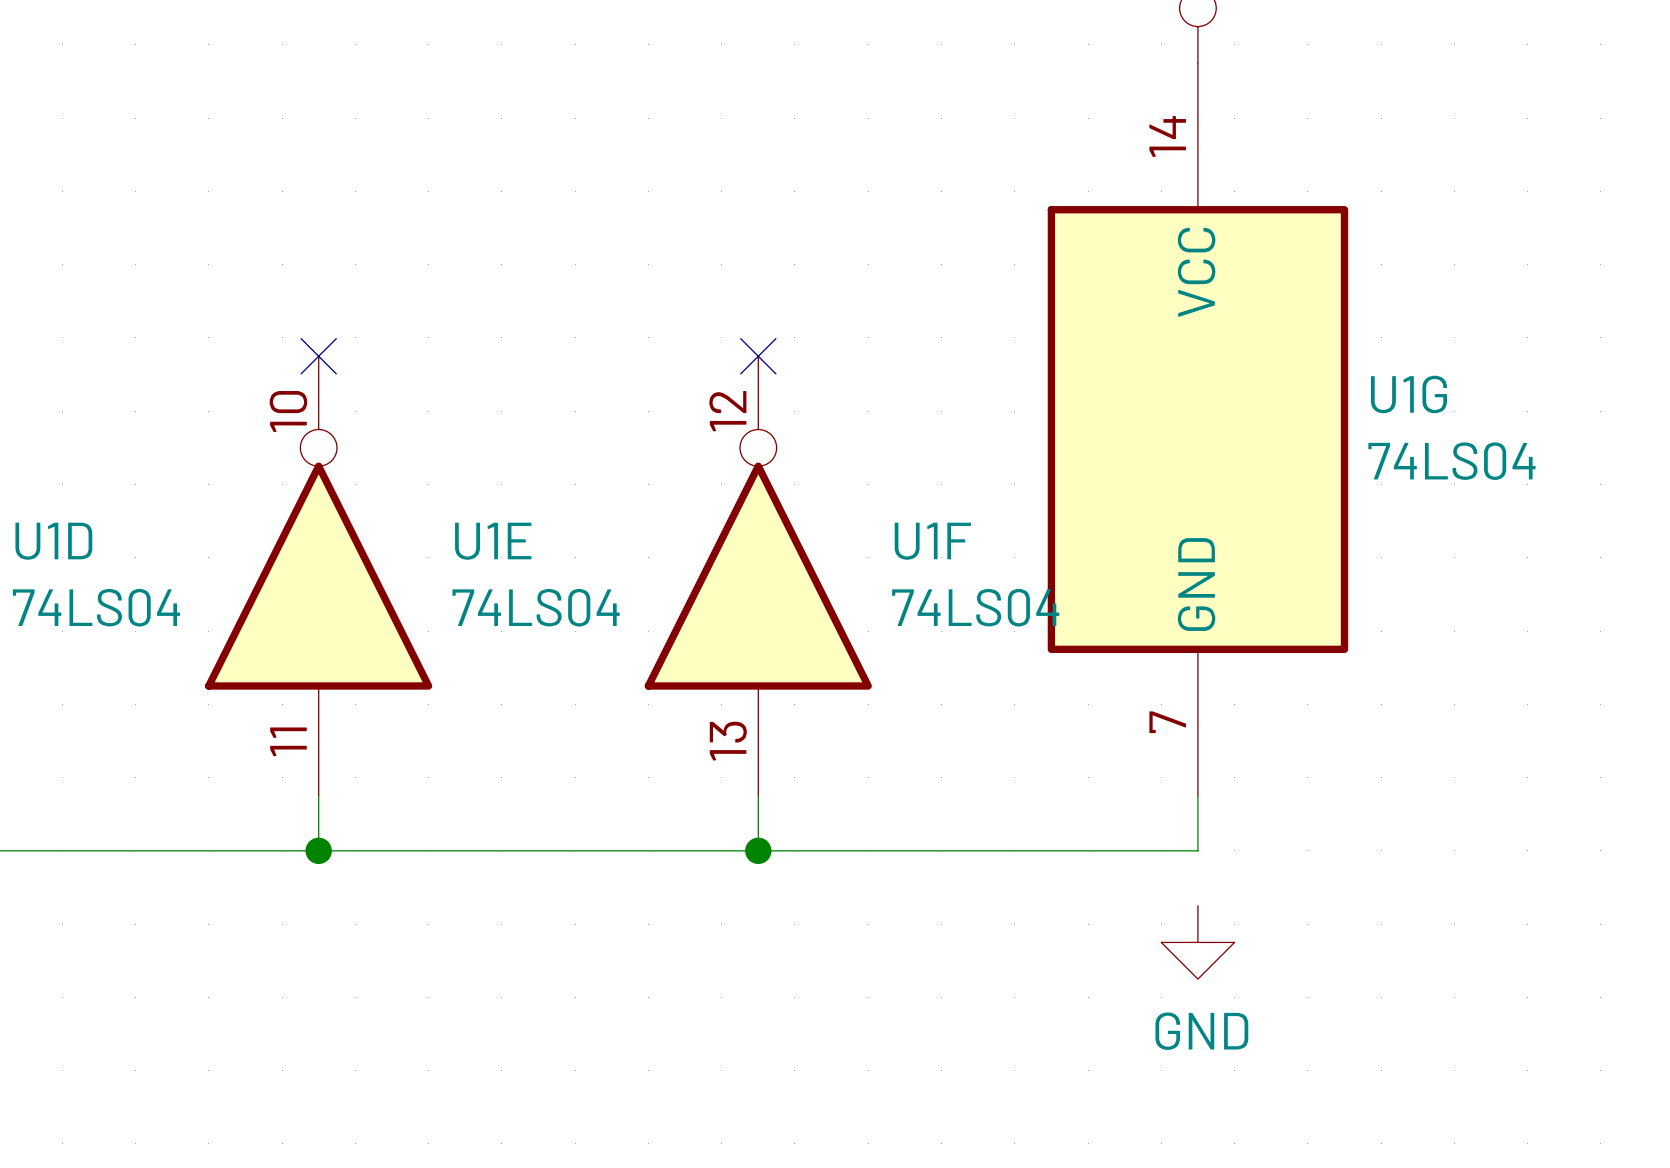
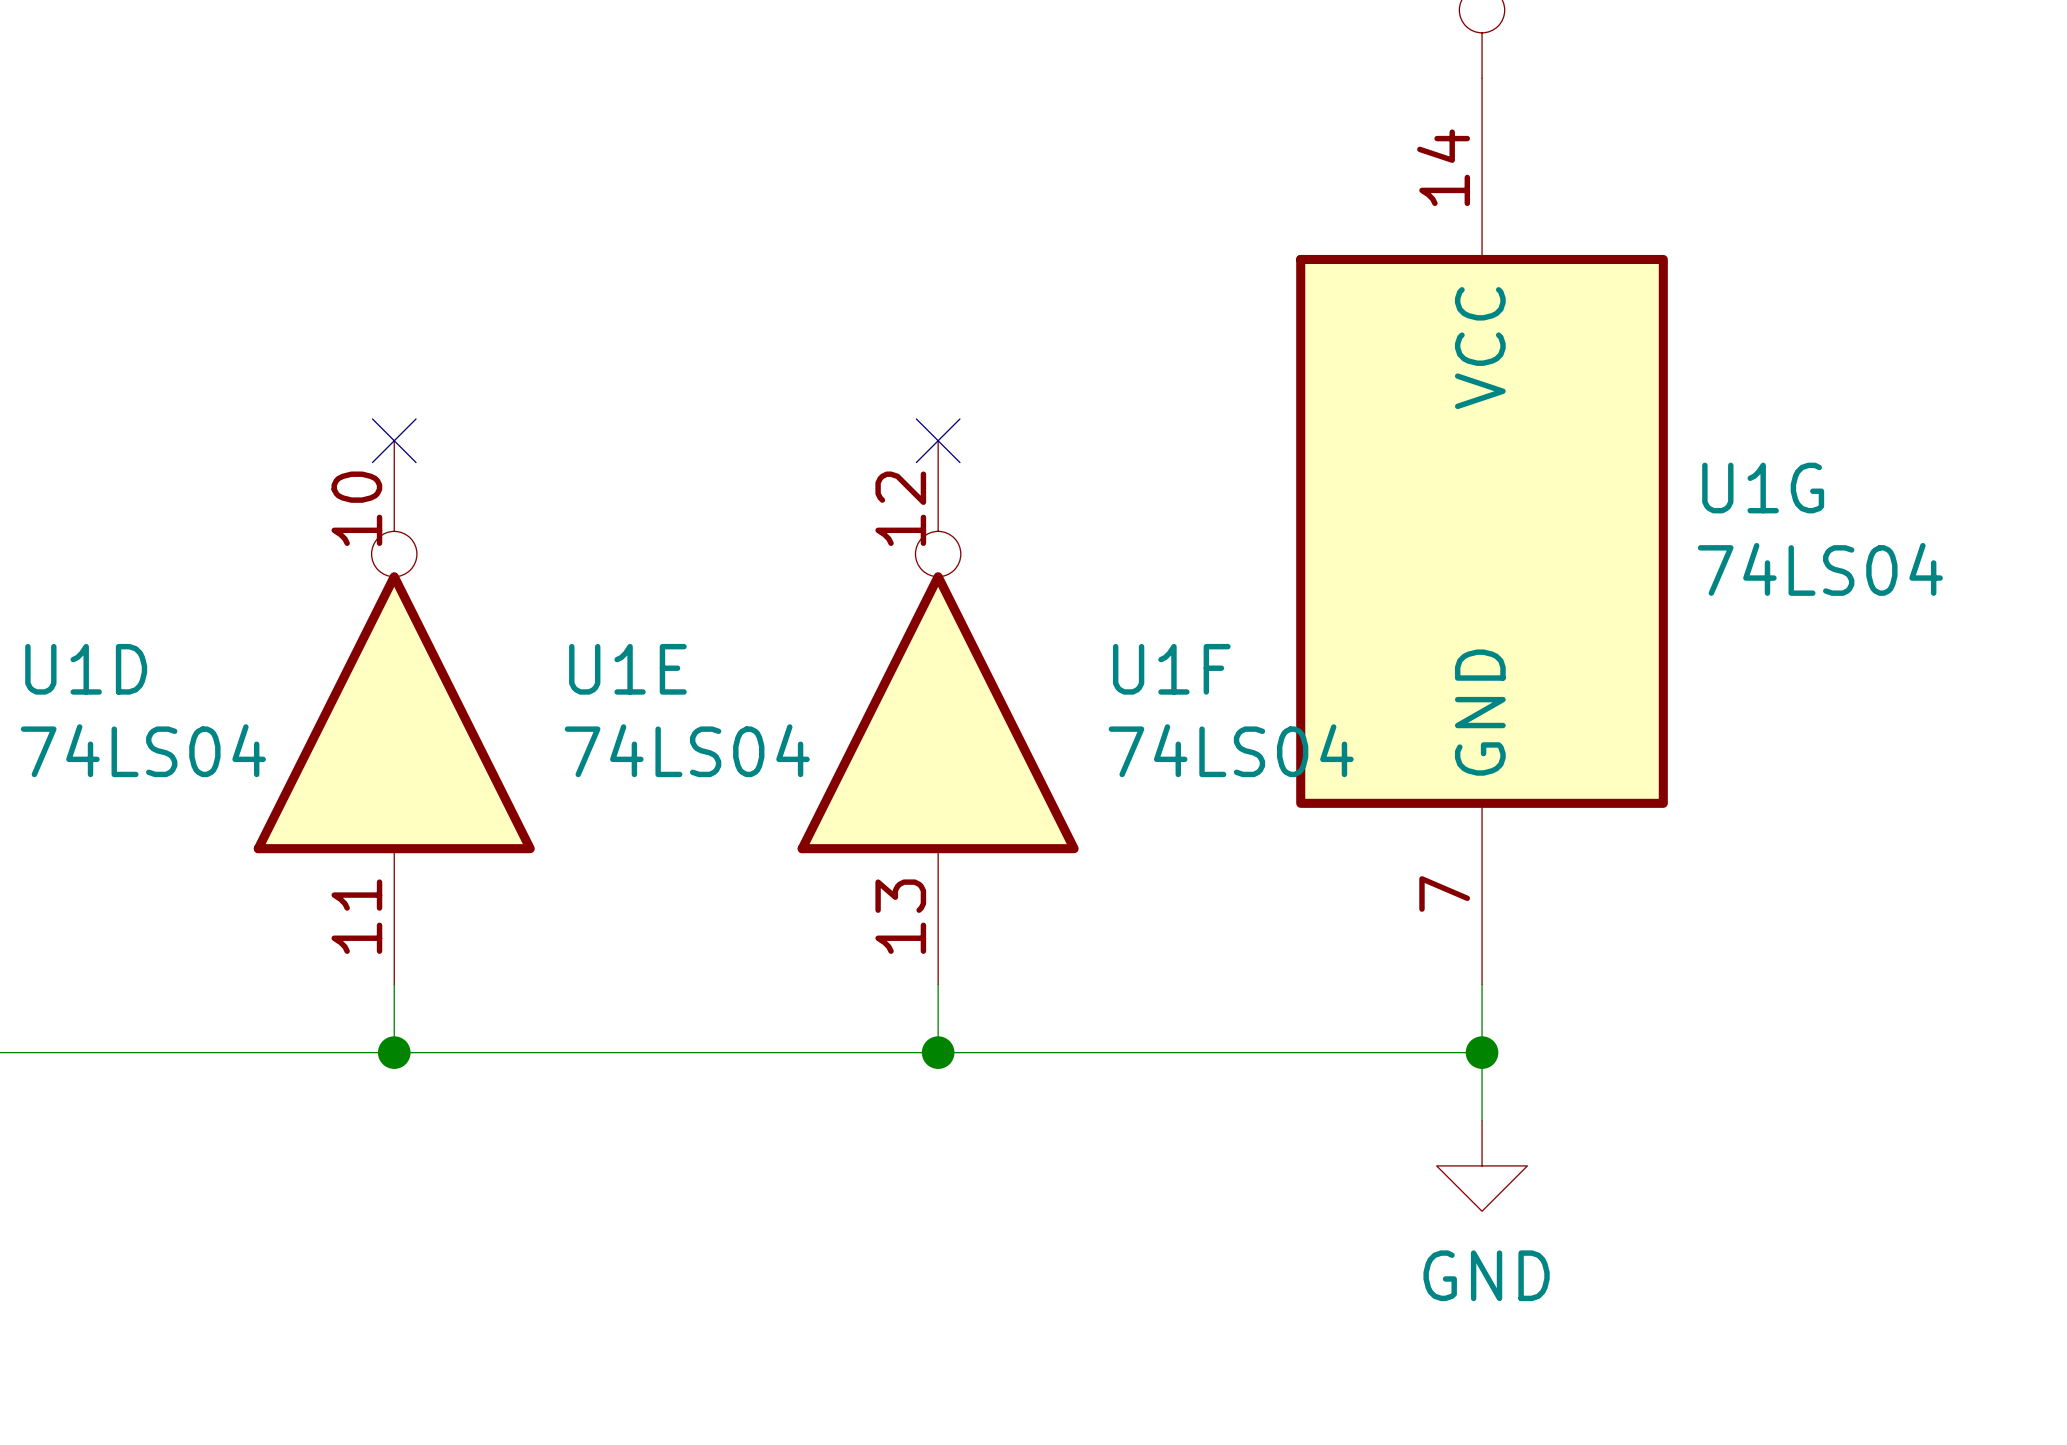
wire: none -> (1482, 1052) (1482, 1120)
junction: none -> (1482, 1052)

